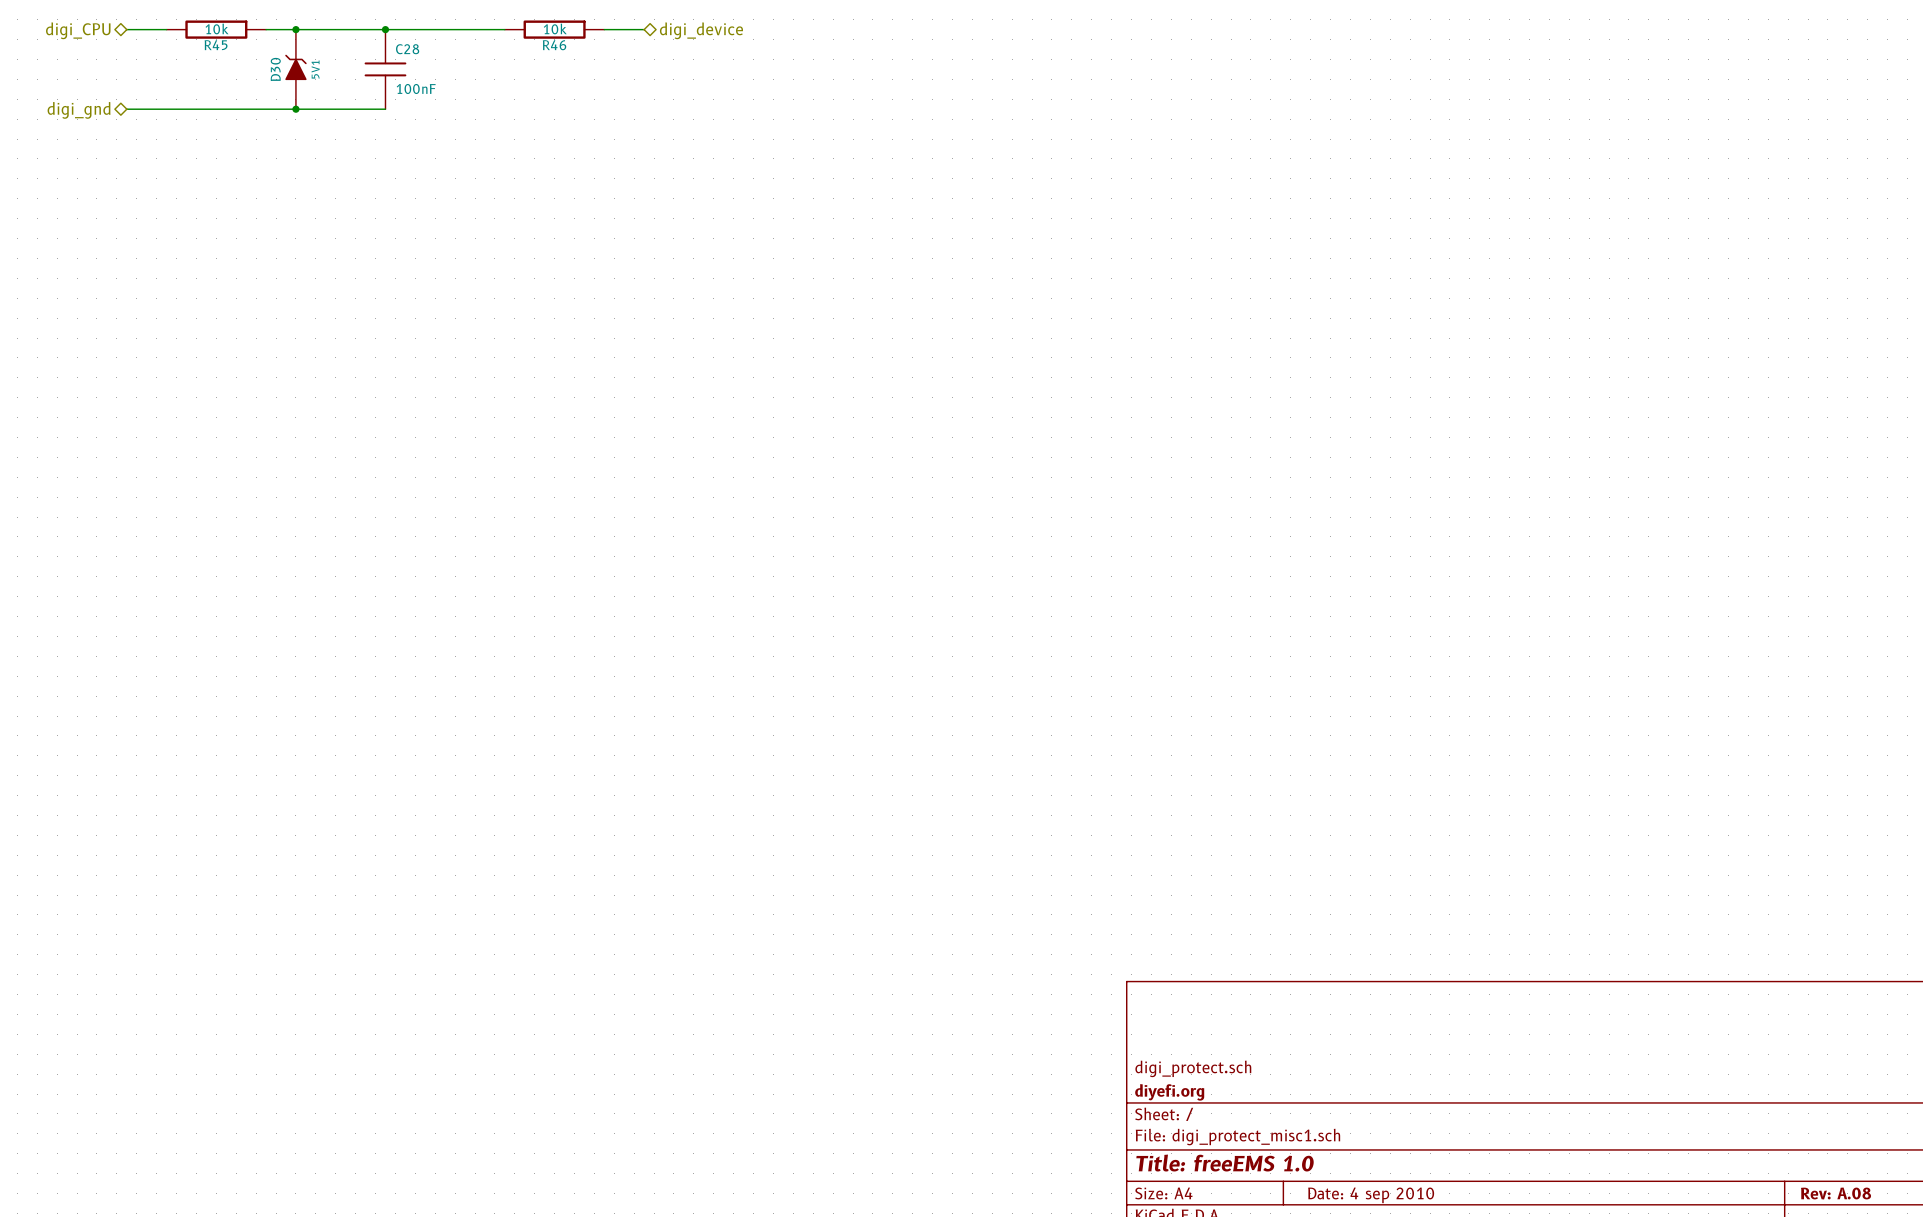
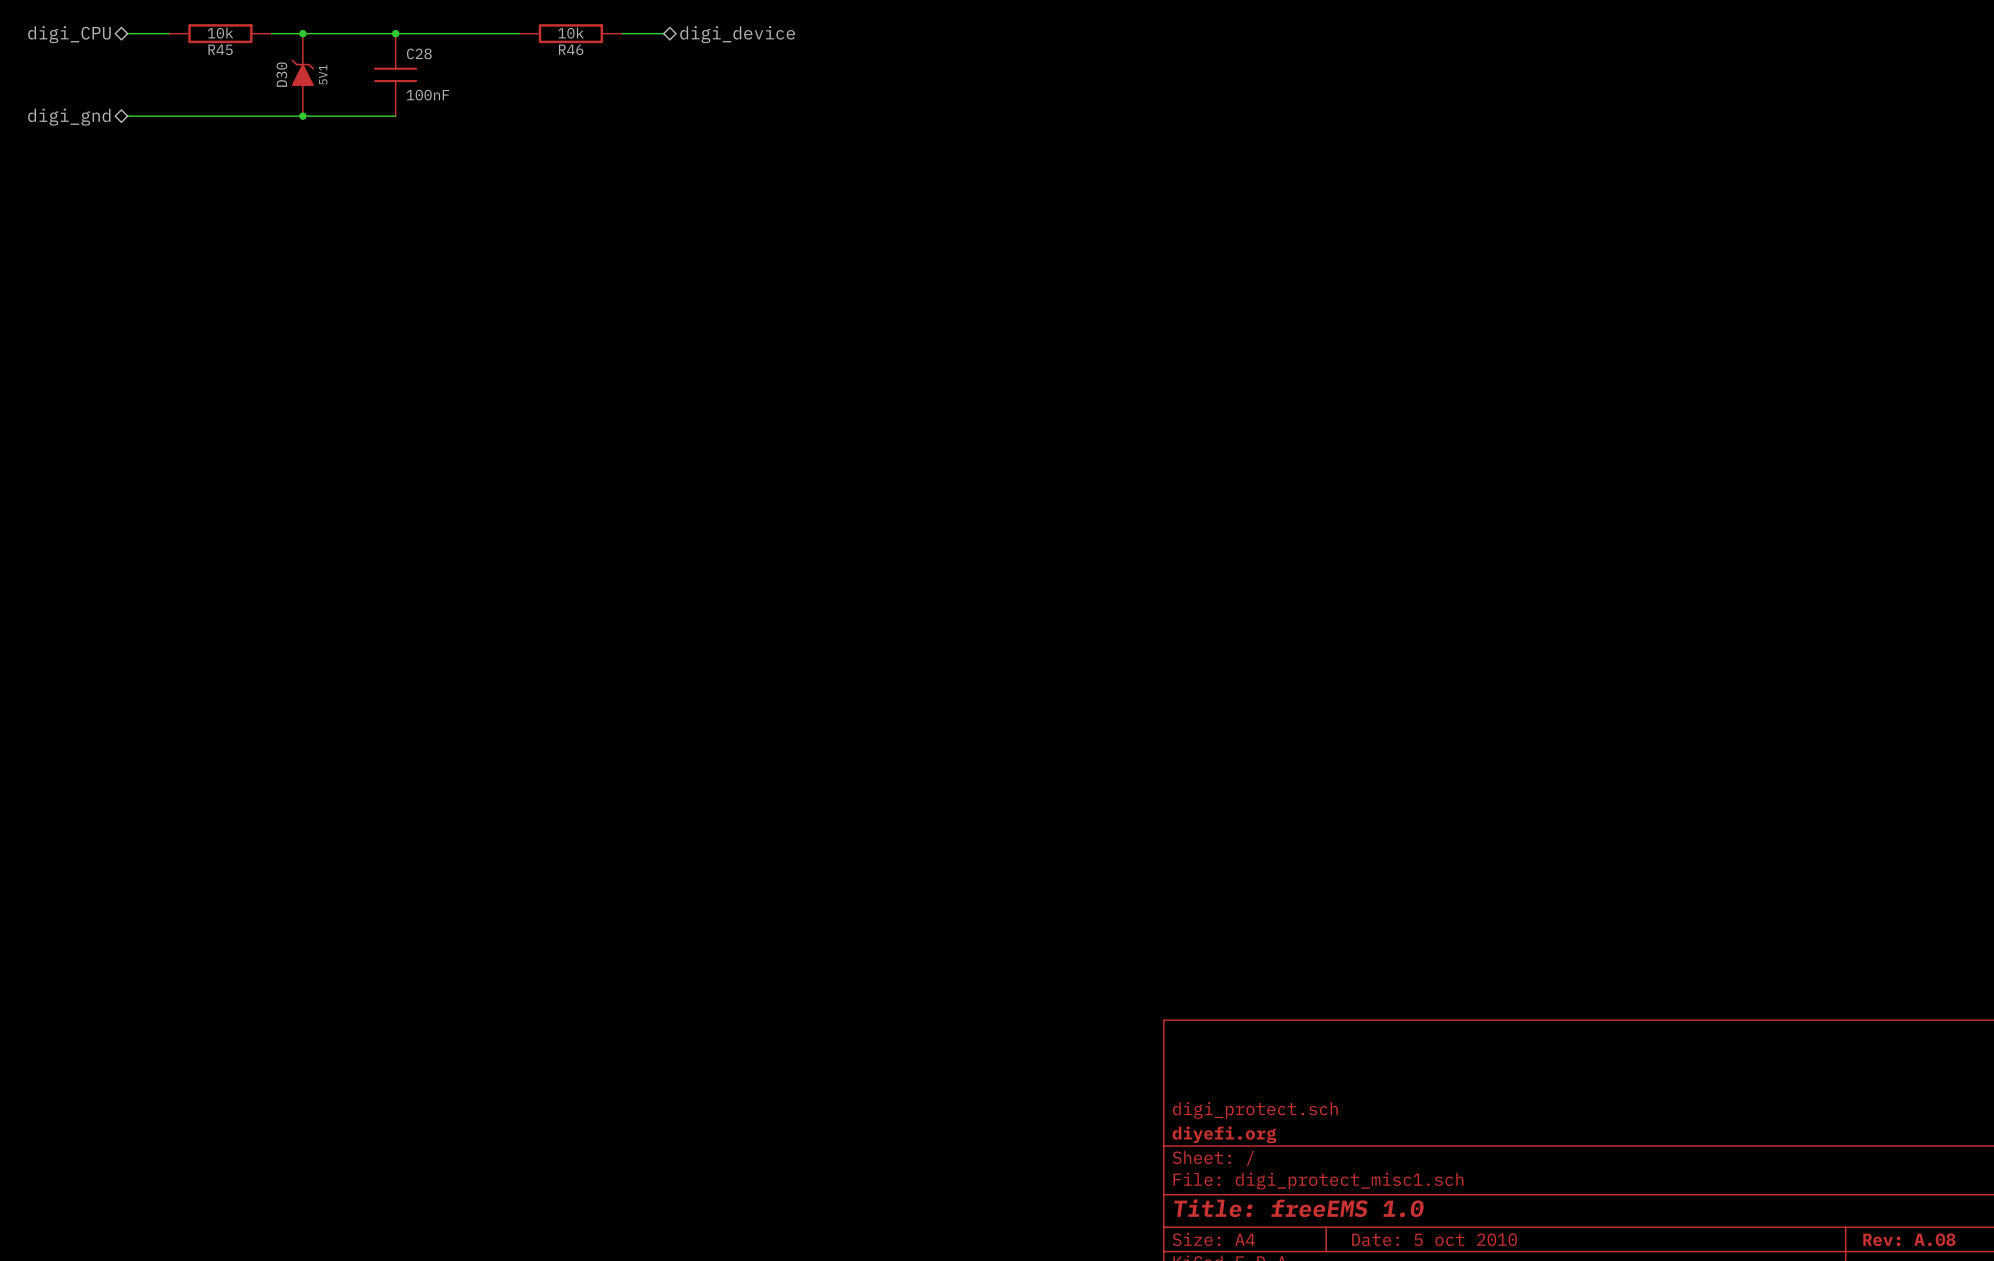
title block: Date: 4 sep 2010 (1371, 1195) -> Date: 5 oct 2010 (1434, 1239)

